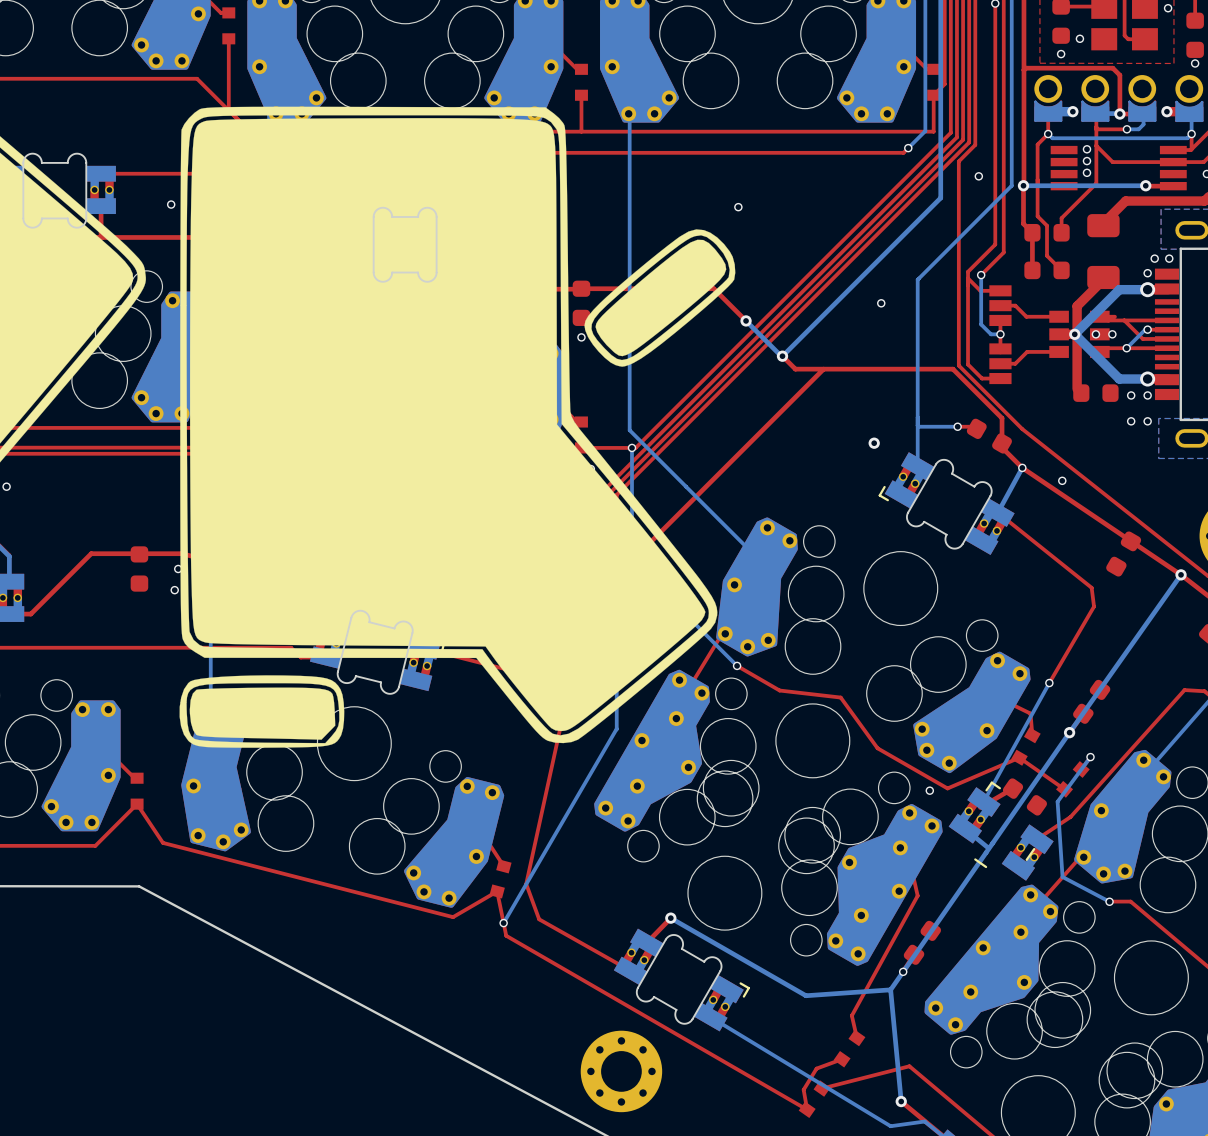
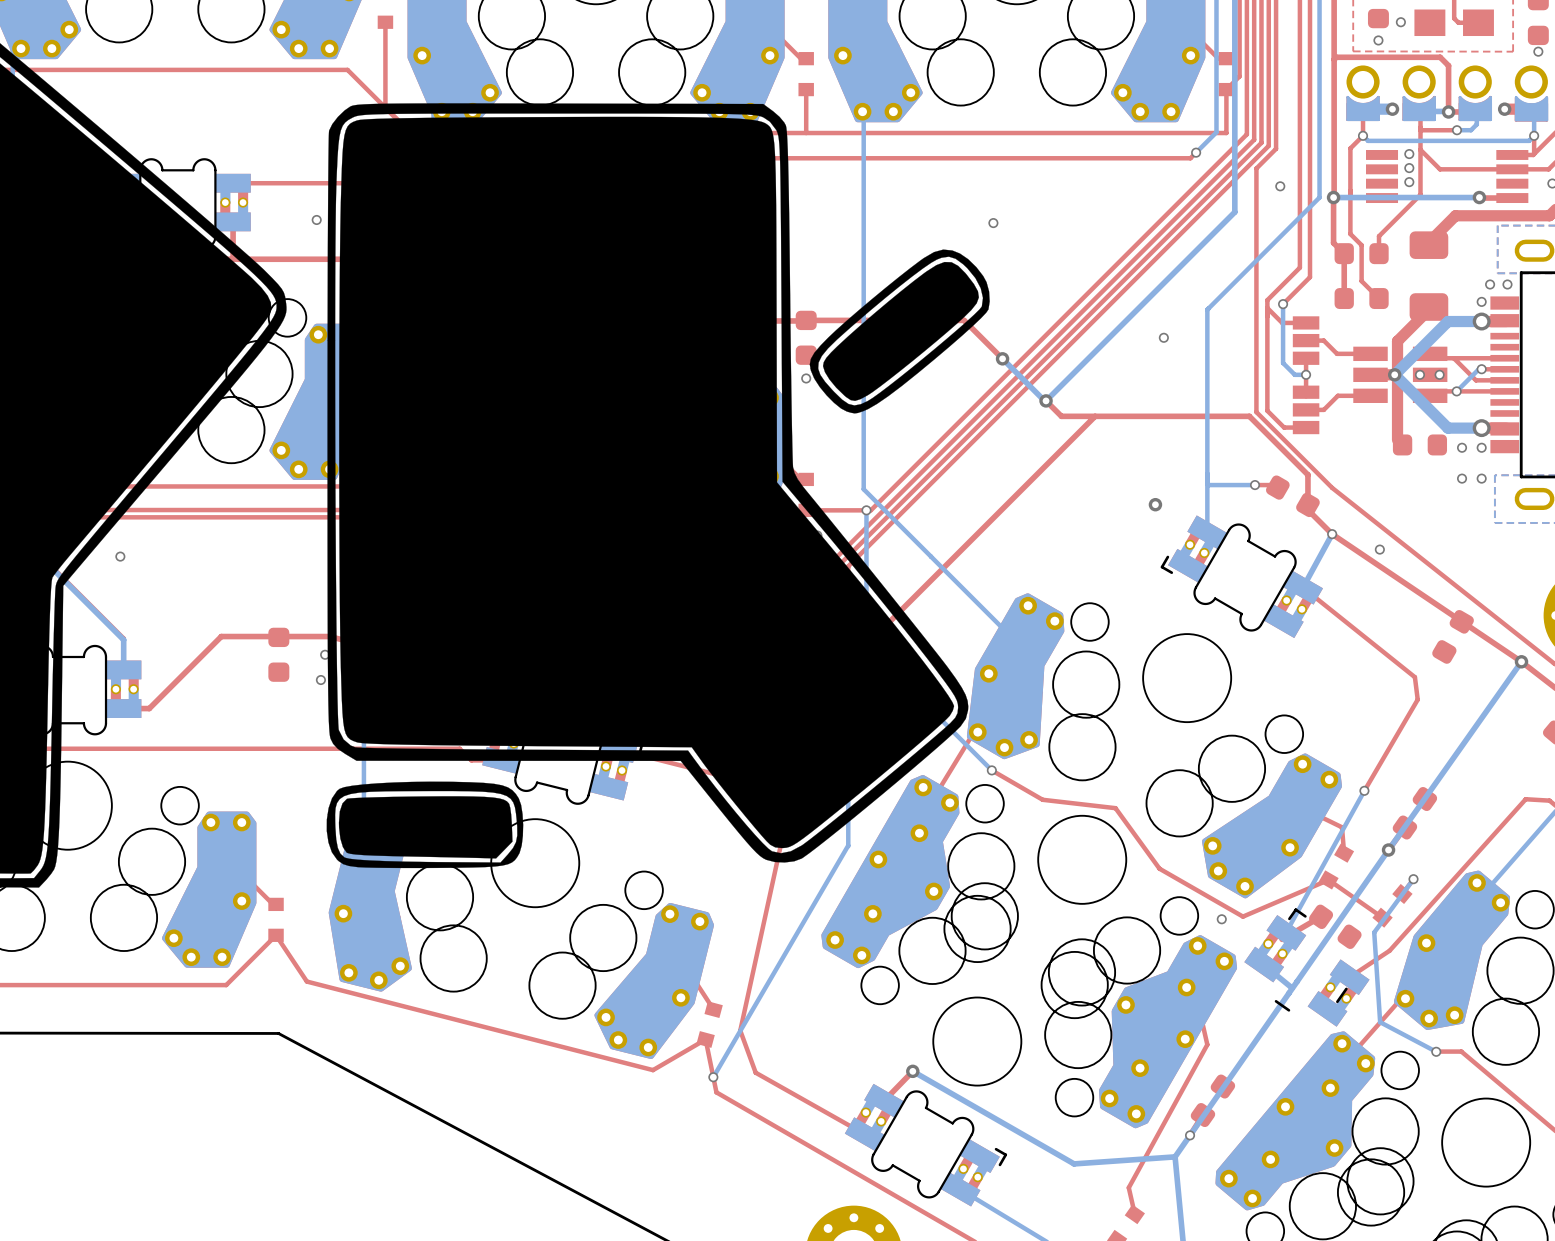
part footprint: [1049, 310, 1110, 358] -> [1353, 346, 1448, 403]

